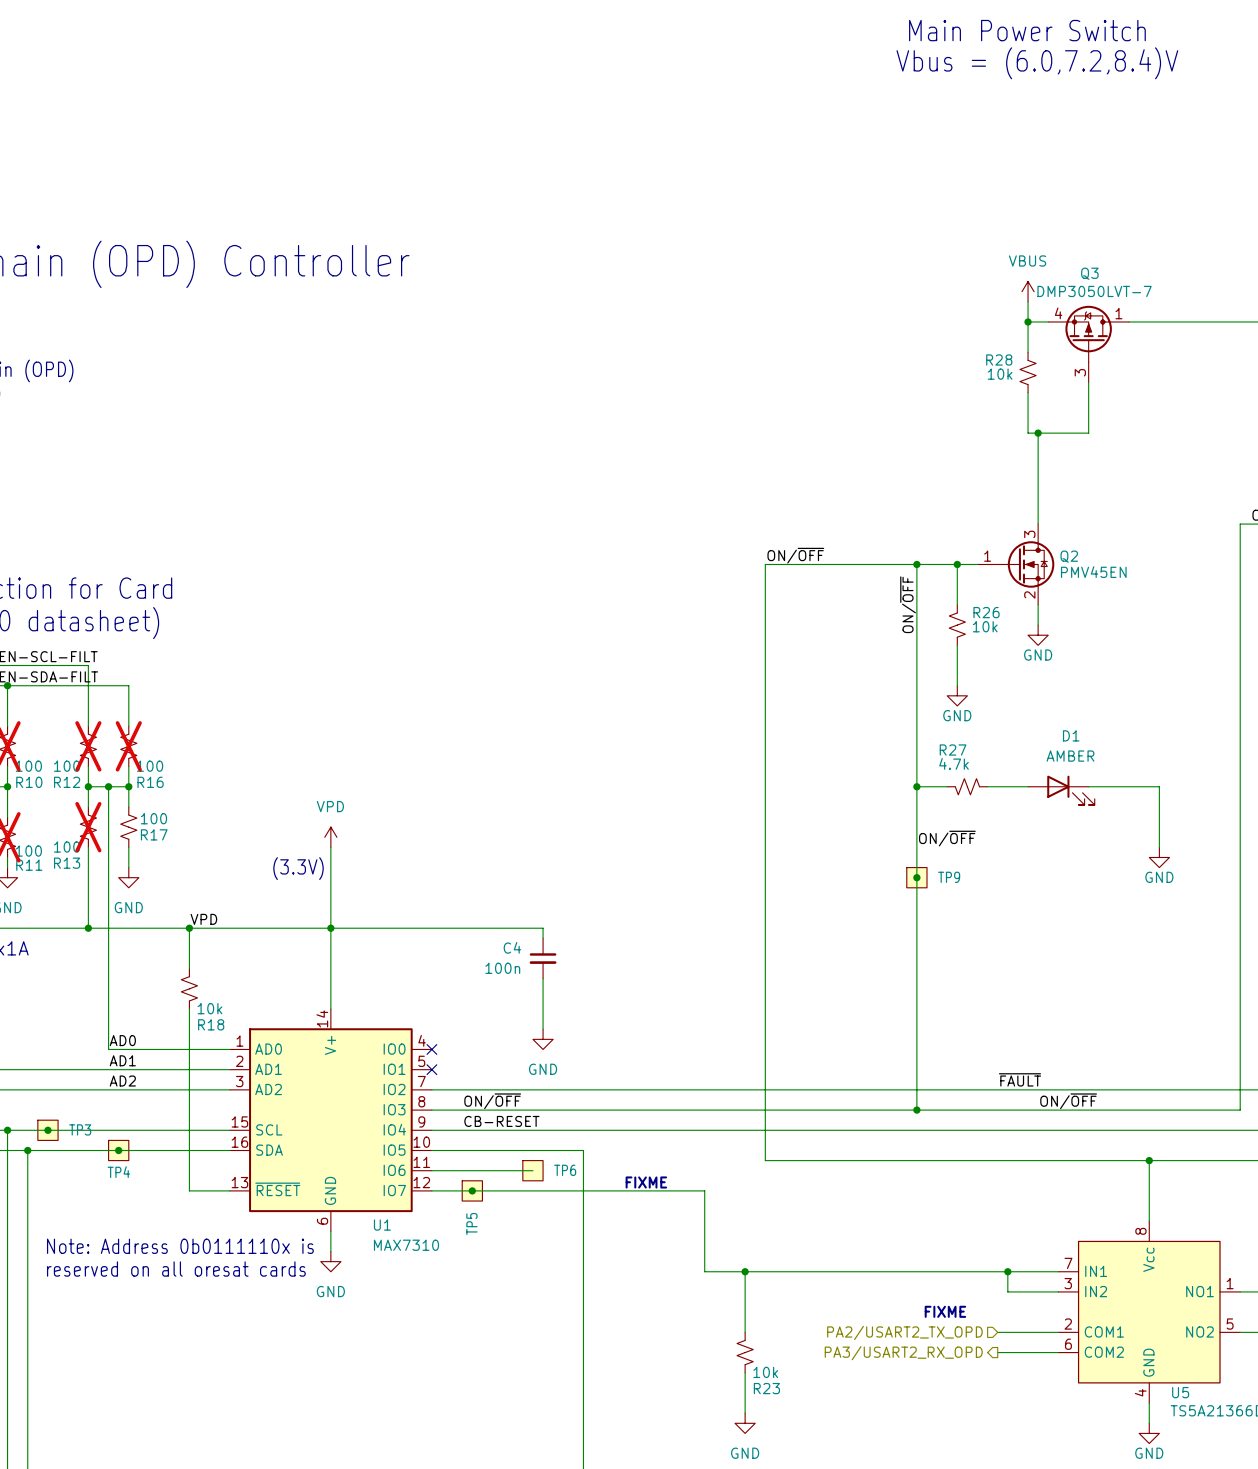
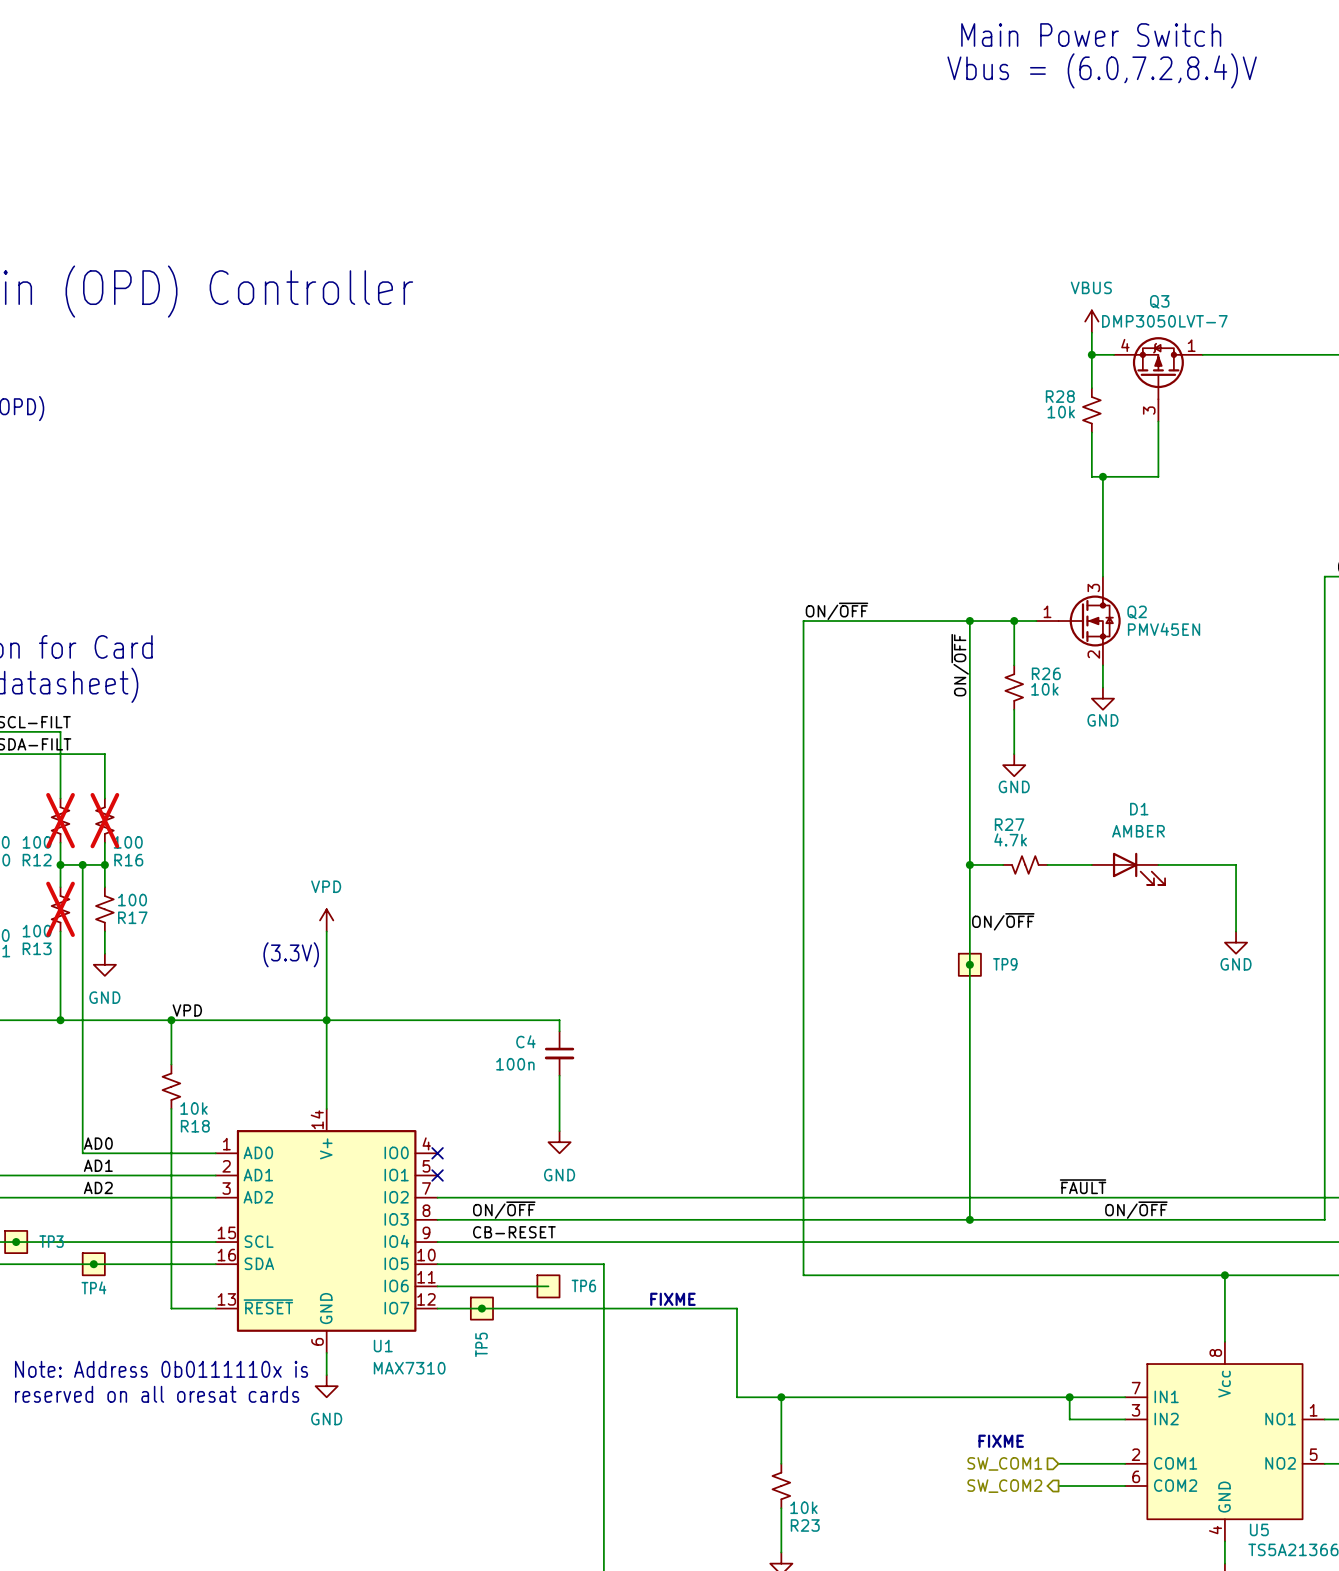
hierarchical label: PA2/USART2_TX_OPD (904, 1332) -> SW_COM1 (1004, 1463)
hierarchical label: PA3/USART2_RX_OPD (903, 1353) -> SW_COM2 (1004, 1486)

